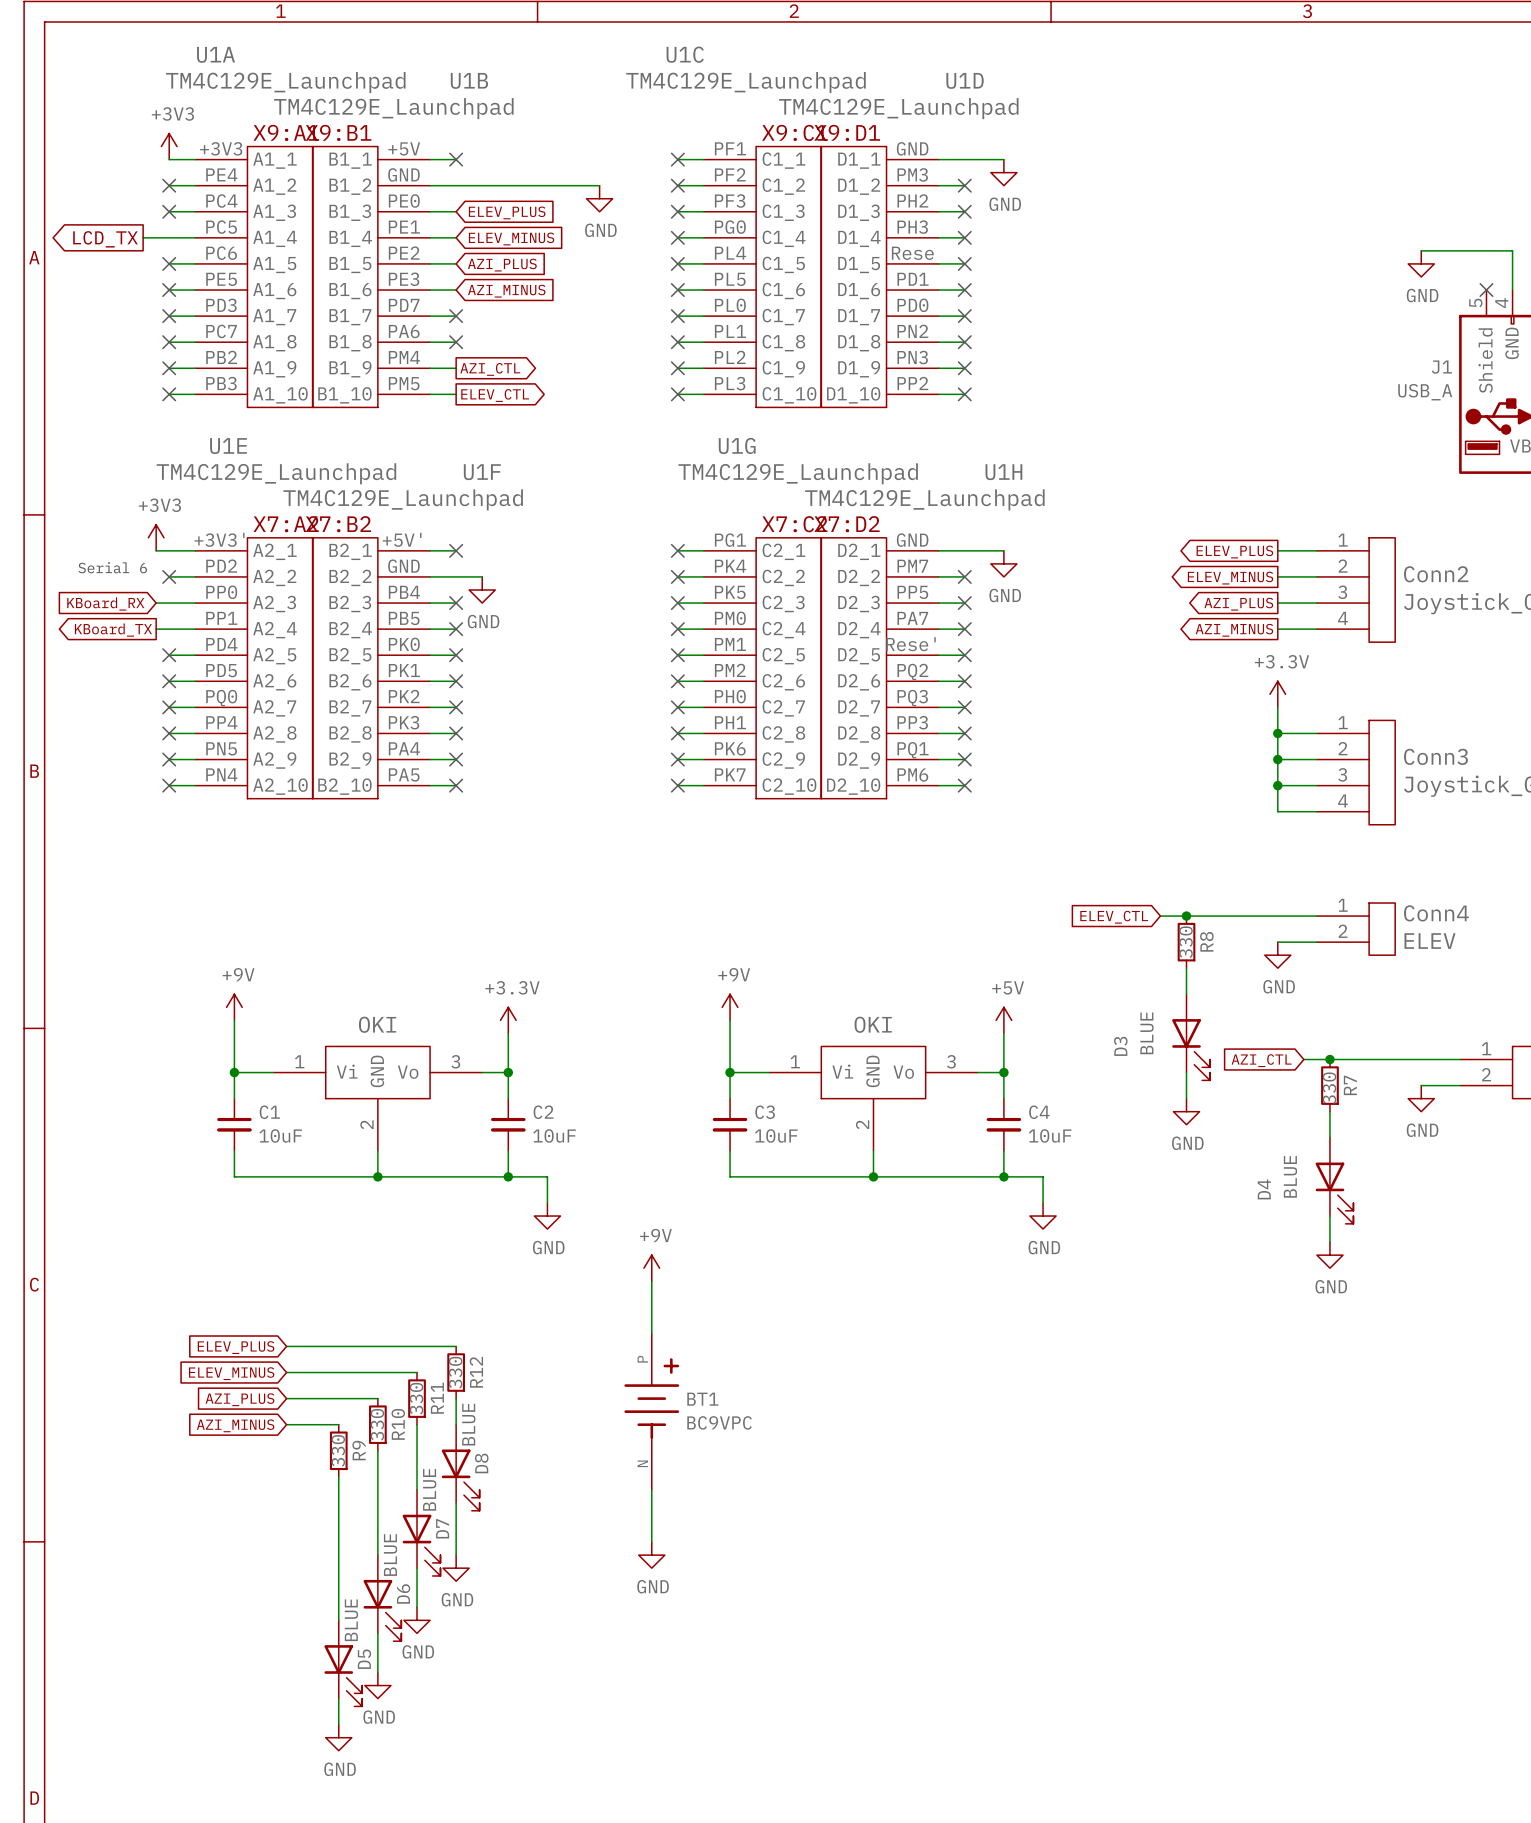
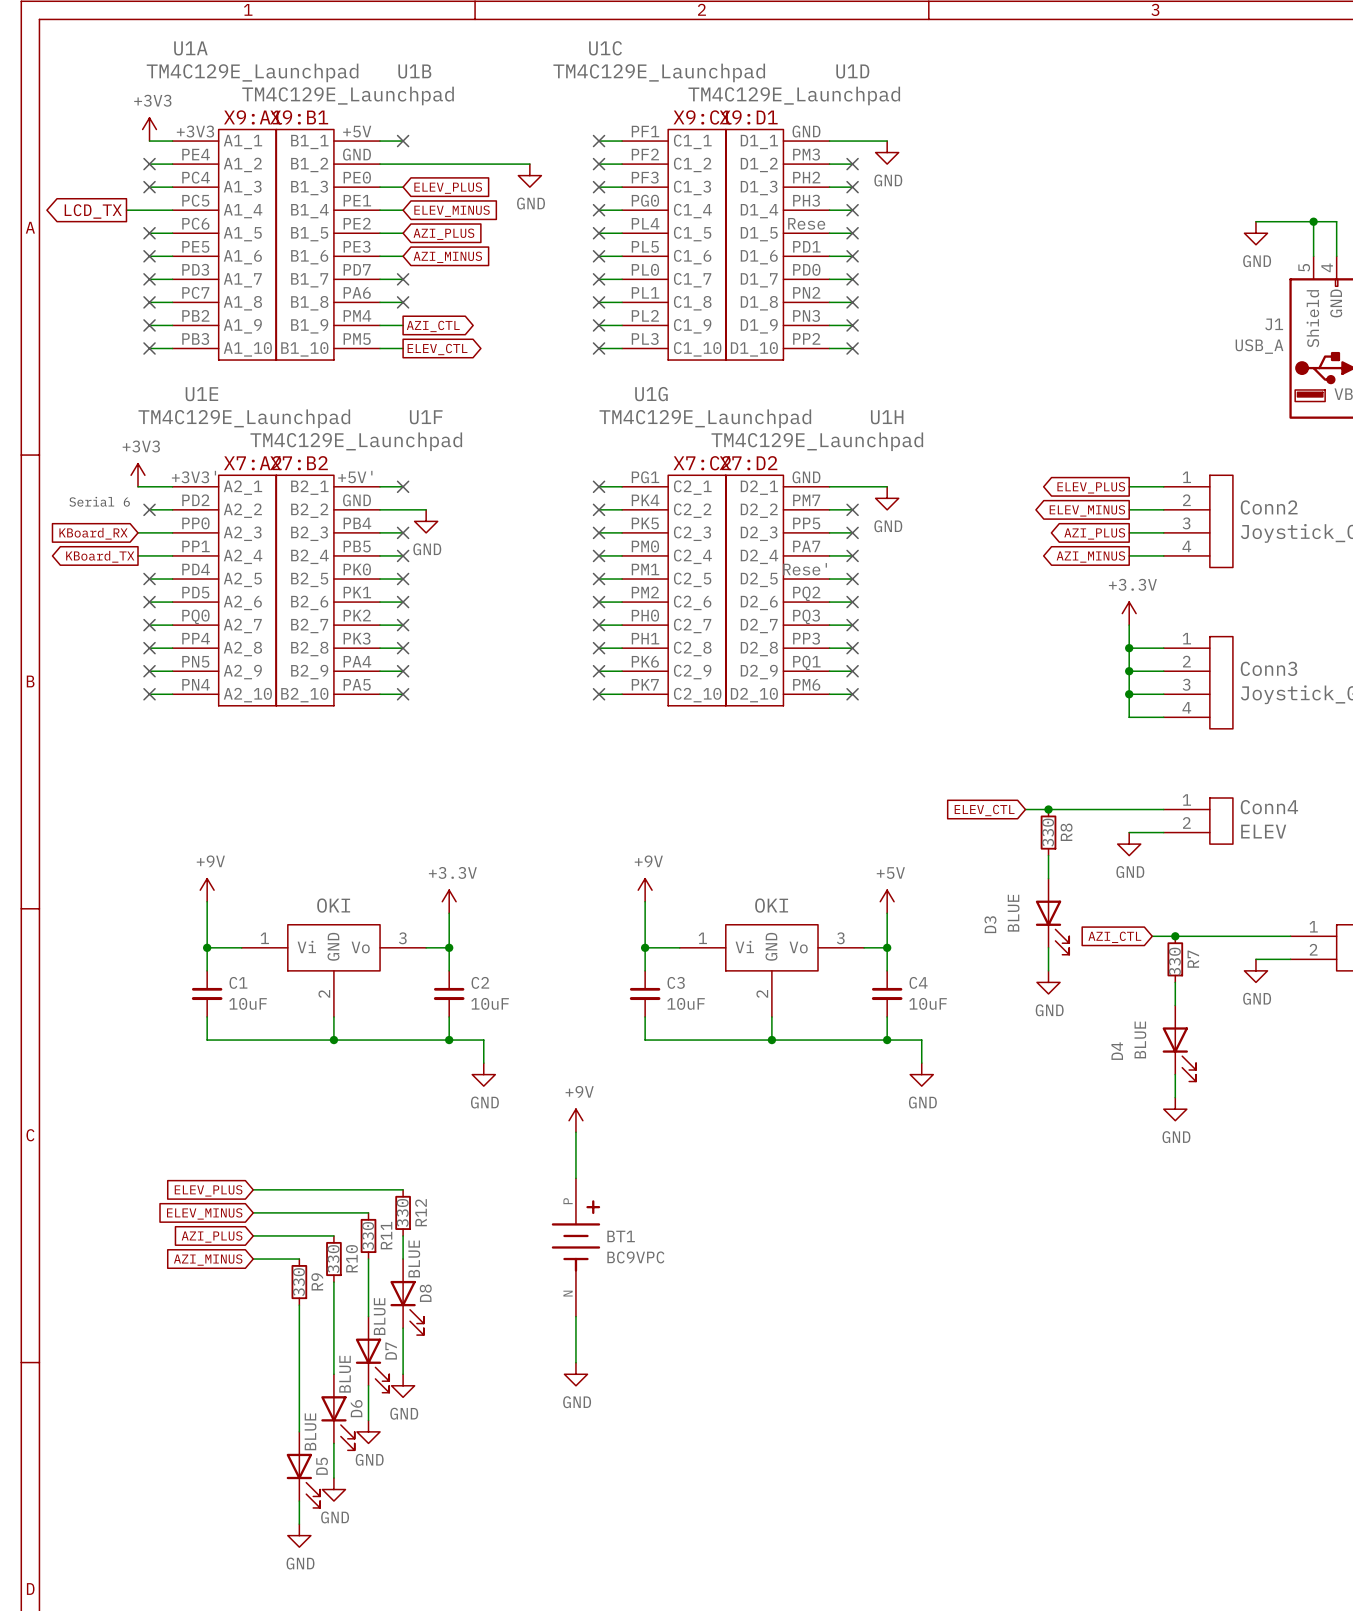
wire: none -> (1313, 221) (1313, 256)
junction: none -> (1313, 221)
no-connect mark: (1486, 290) -> none

